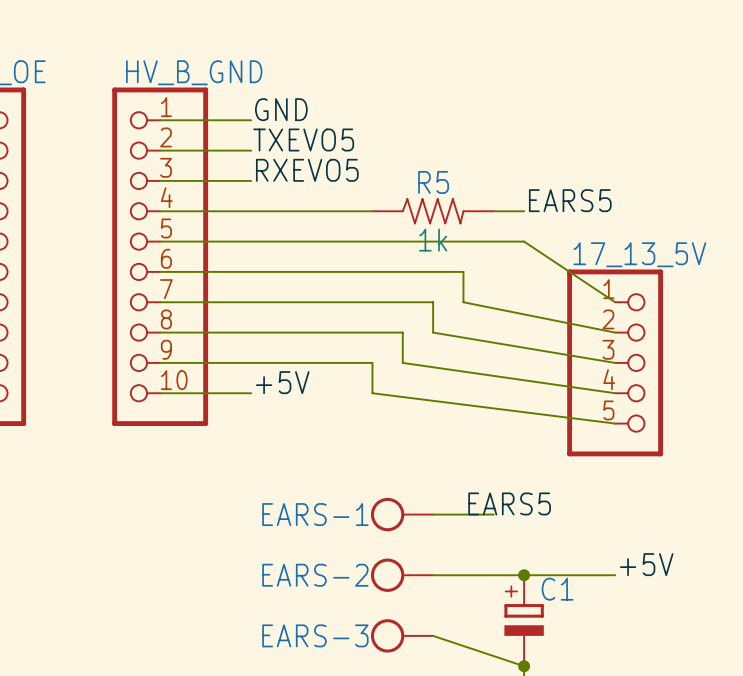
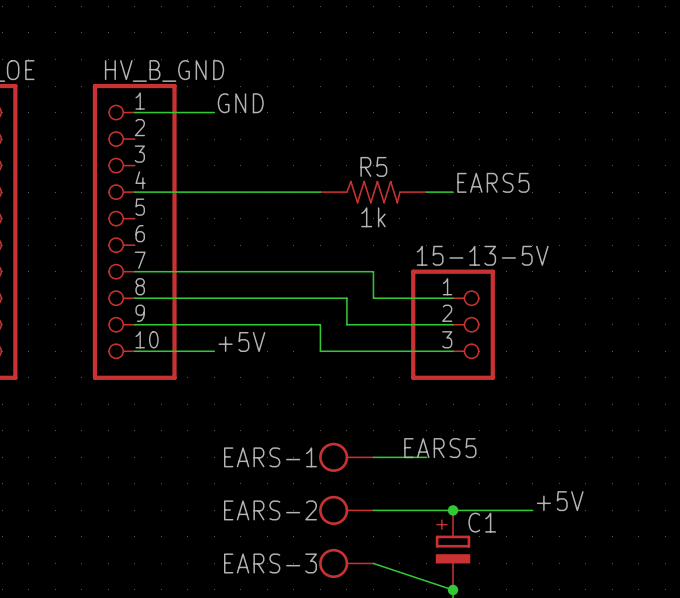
label: TXEVO5 (303, 139) -> none
wire: (160, 150) (251, 150) -> none
label: RXEVO5 (307, 170) -> none
wire: (160, 180) (251, 180) -> none
wire: (160, 241) (524, 241) (615, 302) -> none
wire: (160, 271) (463, 271) (463, 302) (615, 332) -> none
wire: (433, 332) (615, 362) -> (373, 298) (453, 298)
wire: (402, 362) (615, 393) -> (346, 324) (453, 324)
15-13-5V: none -> (453, 324)
17_13_5V: (615, 362) -> none
wire: (372, 393) (615, 423) -> (320, 351) (453, 351)

